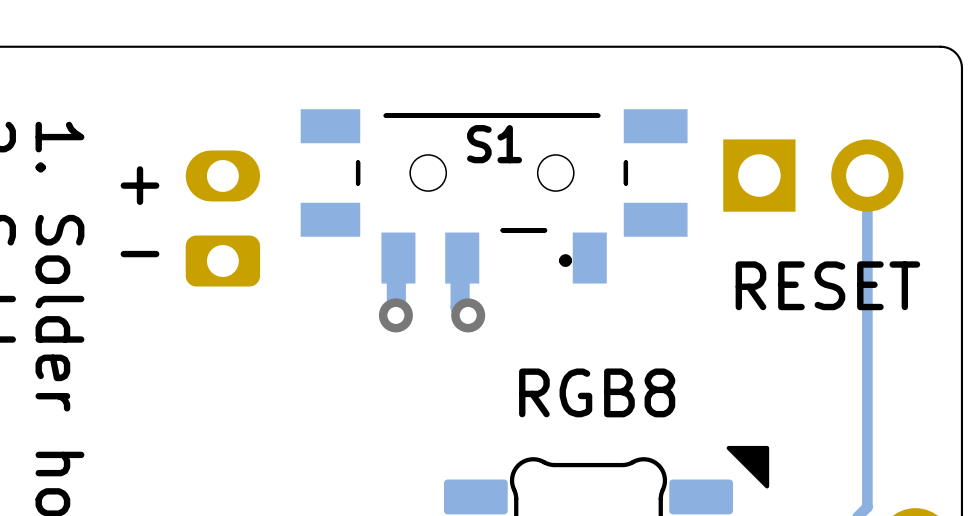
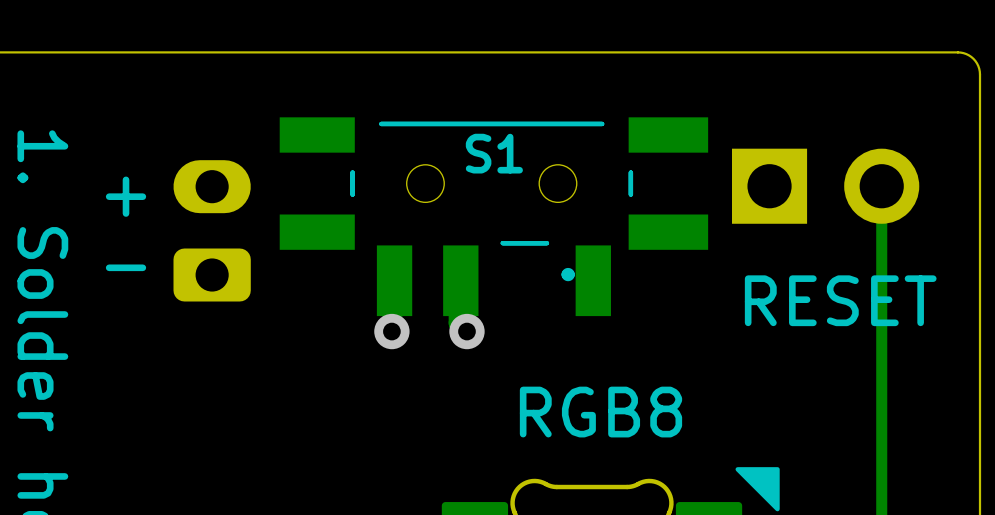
S1 footprint: [300, 109, 688, 284] -> [279, 117, 709, 317]

